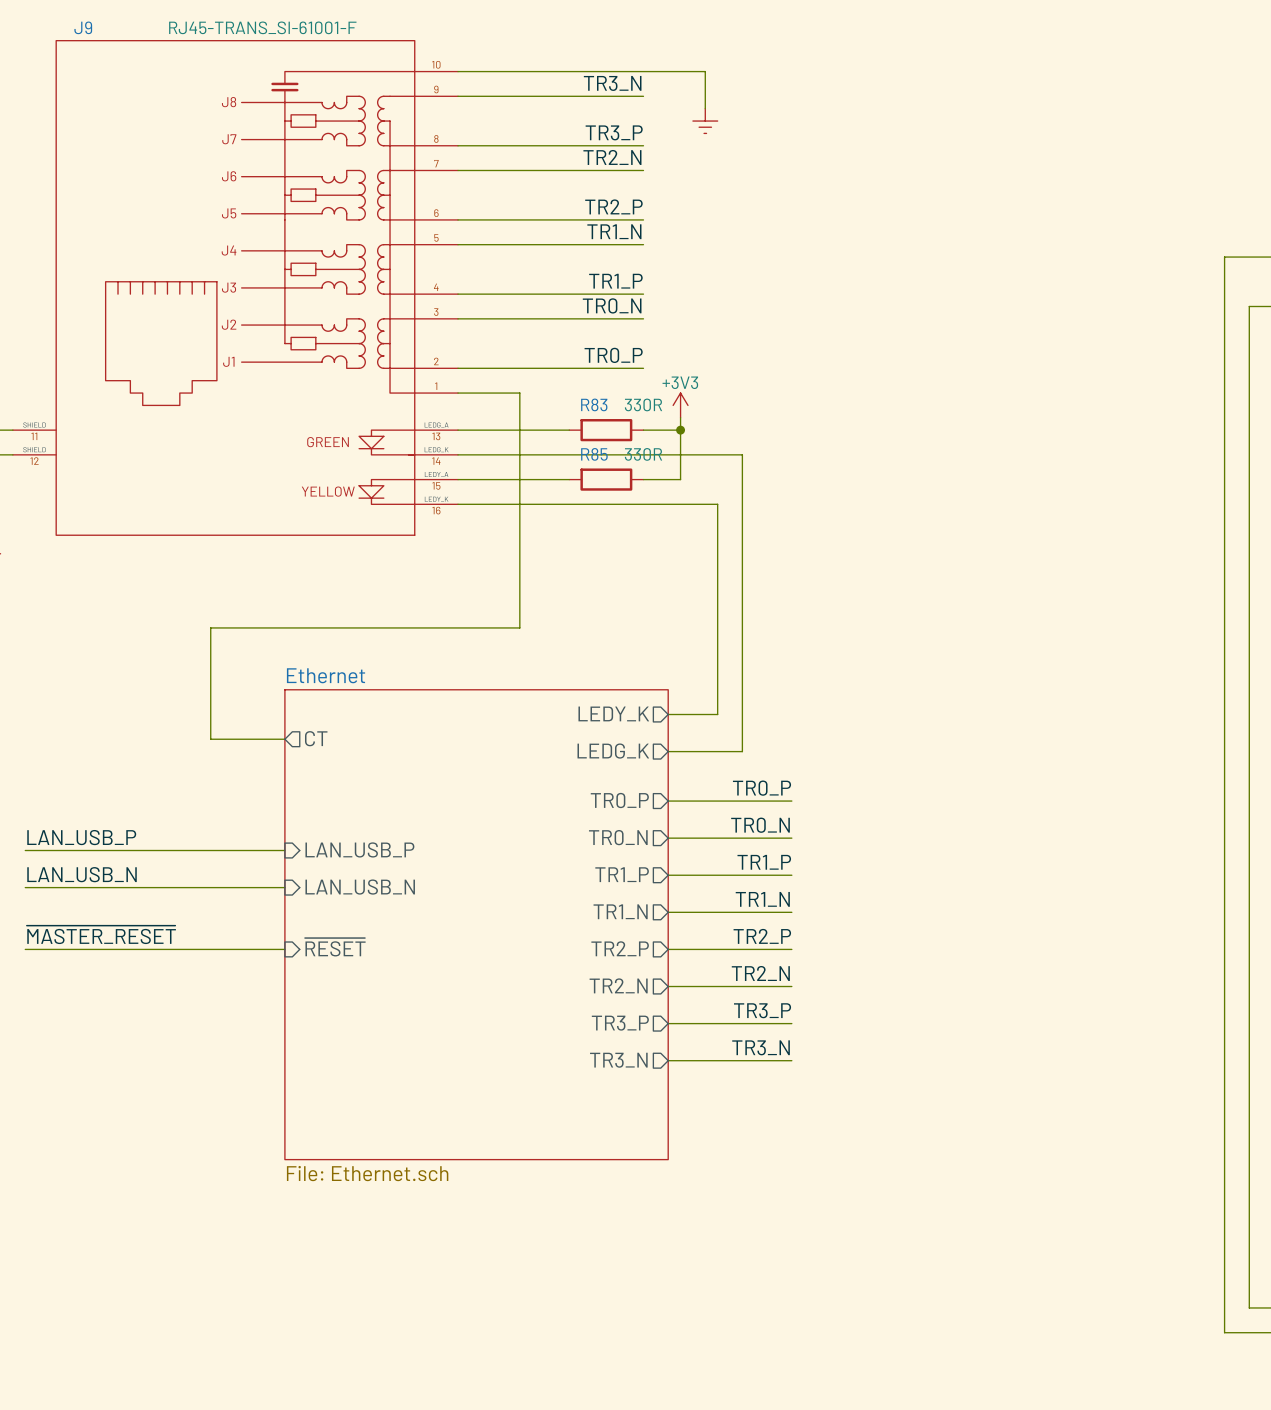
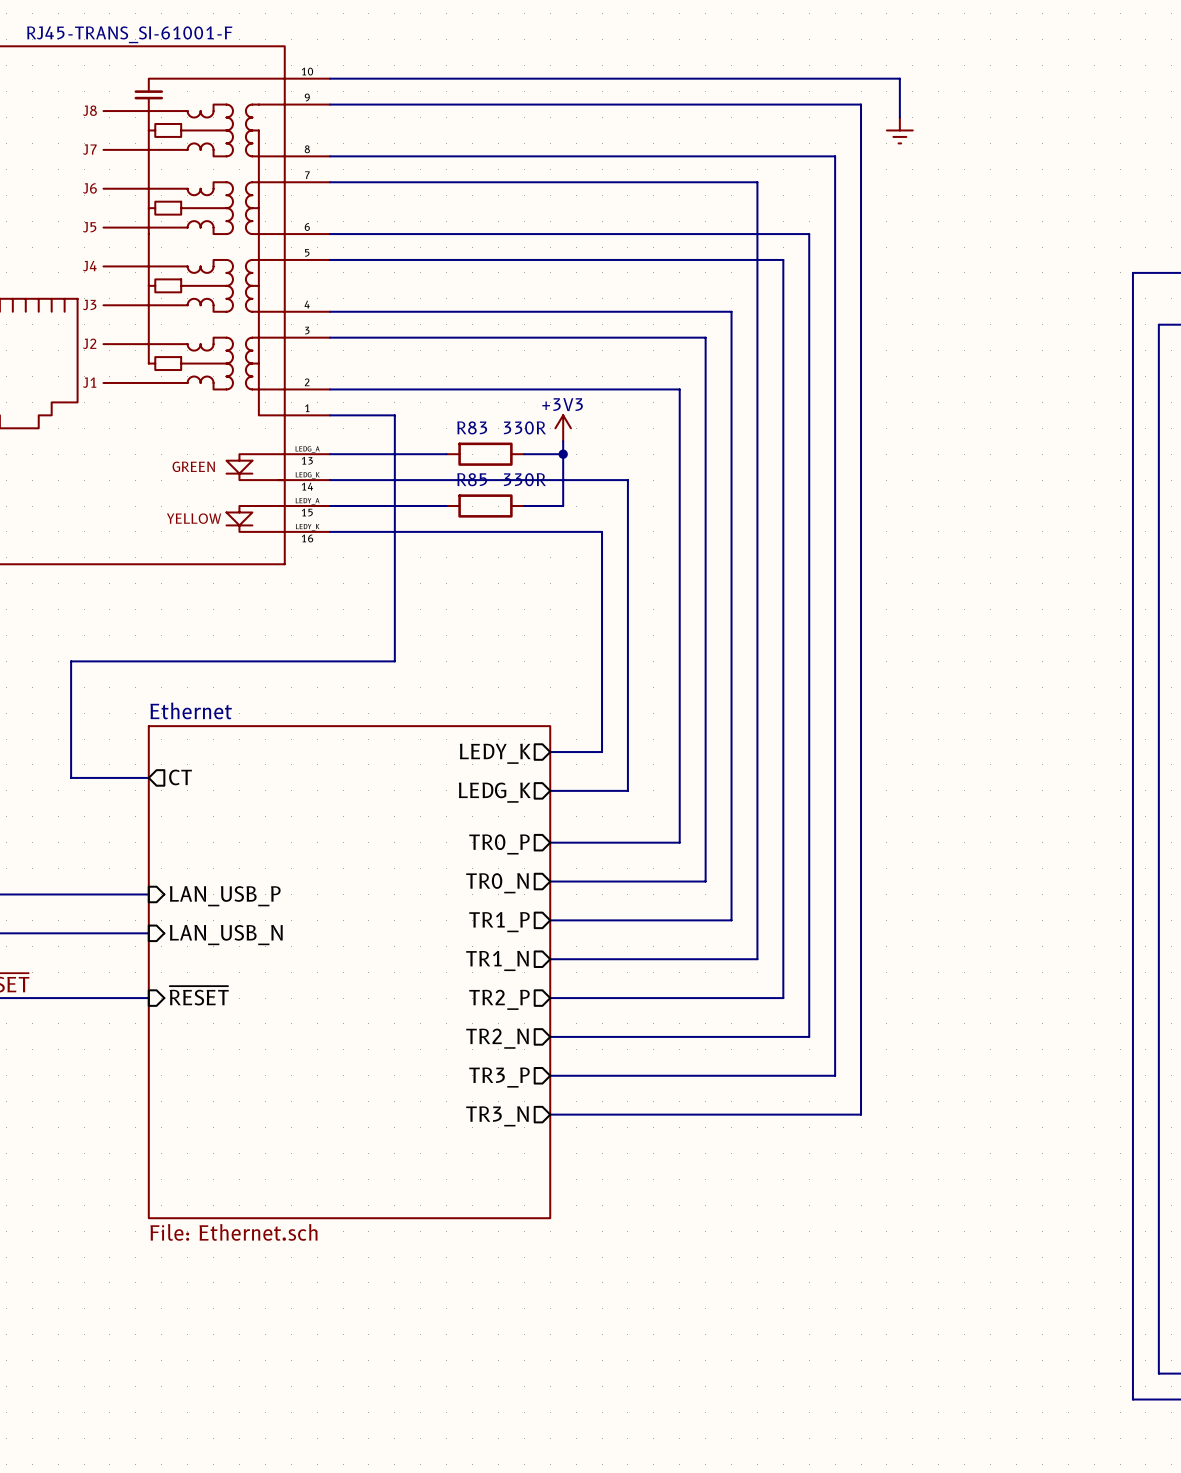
wire: (705, 71) (705, 108) -> (589, 78) (899, 78) (899, 117)
label: TR3_N (612, 83) -> none
wire: none -> (524, 104) (861, 104) (861, 1114) (679, 1114)
power symbol: (705, 121) -> none
power symbol: none -> (899, 130)
label: TR3_P (614, 132) -> none
wire: none -> (524, 156) (835, 156) (835, 1075) (679, 1075)
label: TR2_N (612, 157) -> none
wire: none -> (524, 182) (757, 182) (757, 959) (679, 959)
label: TR2_P (613, 206) -> none
wire: none -> (524, 234) (809, 234) (809, 1036) (679, 1036)
label: TR1_N (614, 231) -> none
wire: none -> (524, 259) (783, 259) (783, 998) (679, 998)
label: TR1_P (615, 281) -> none
wire: none -> (524, 311) (731, 311) (731, 920) (679, 920)
label: TR0_N (612, 305) -> none
wire: none -> (524, 337) (705, 337) (705, 881) (679, 881)
label: TR0_P (613, 355) -> none
wire: none -> (524, 389) (679, 389) (679, 842)
label: TR0_P (761, 788) -> none
label: TR0_N (760, 825) -> none
label: TR1_P (764, 862) -> none
label: TR1_N (762, 899) -> none
label: TR2_P (762, 936) -> none
label: TR2_N (760, 973) -> none
label: TR3_P (762, 1010) -> none
label: TR3_N (761, 1047) -> none

